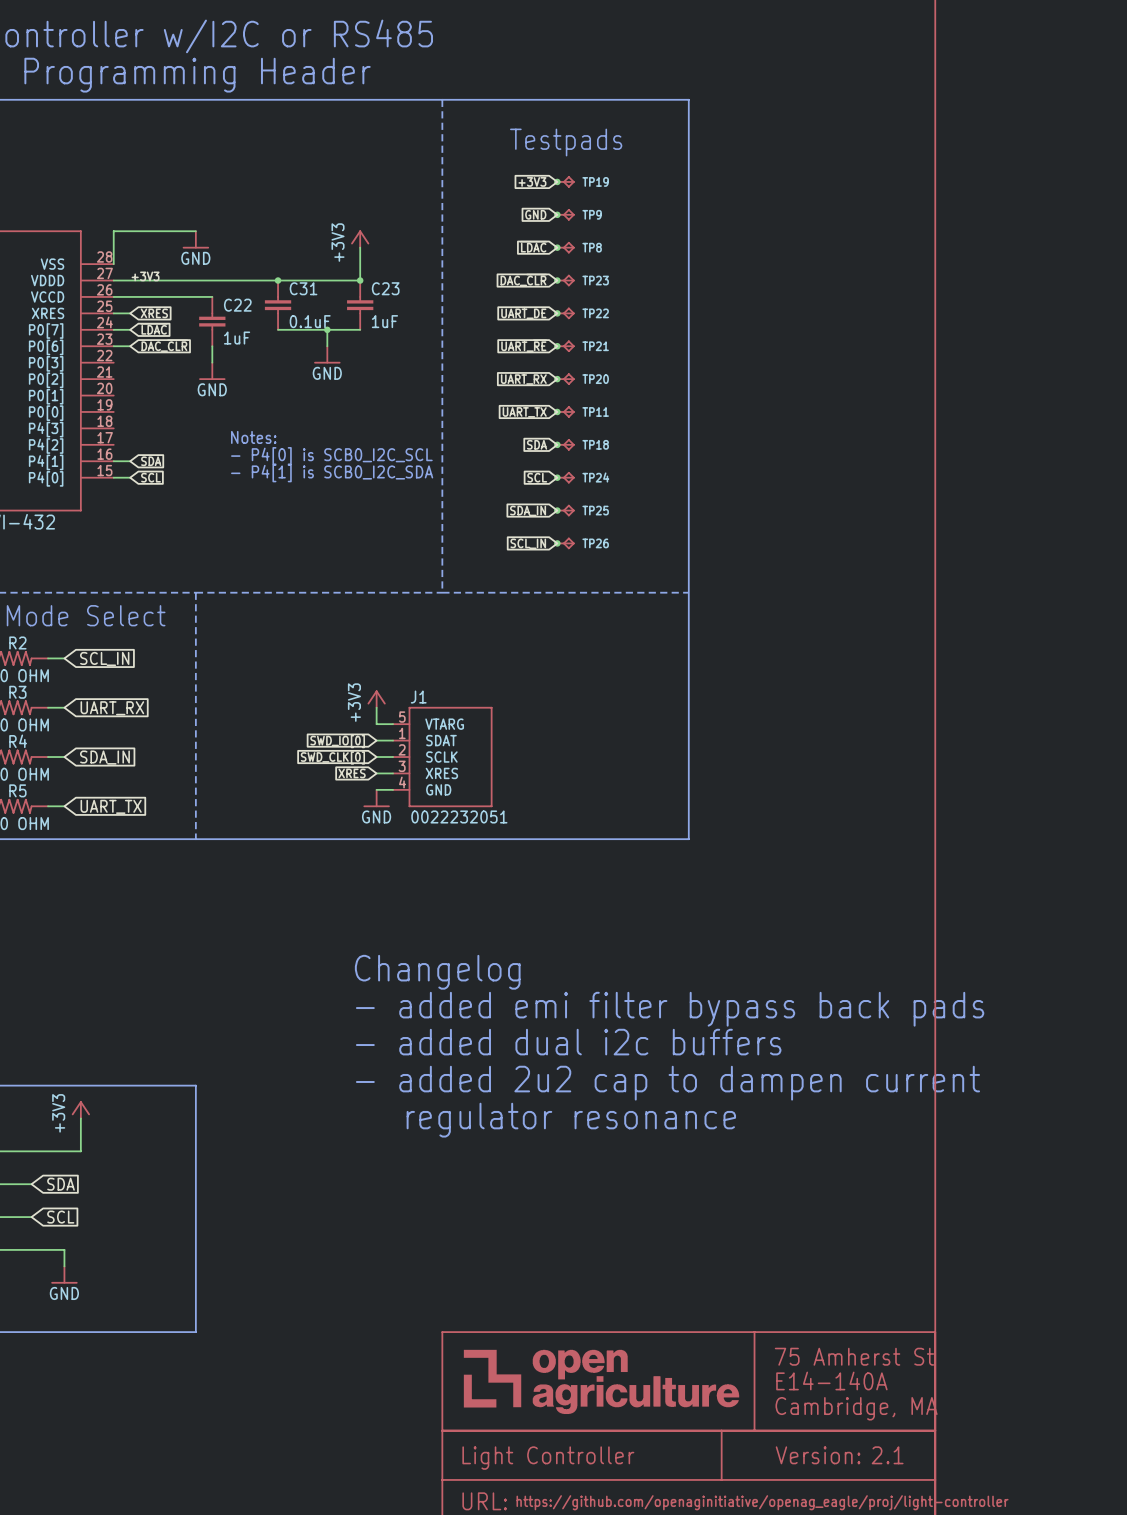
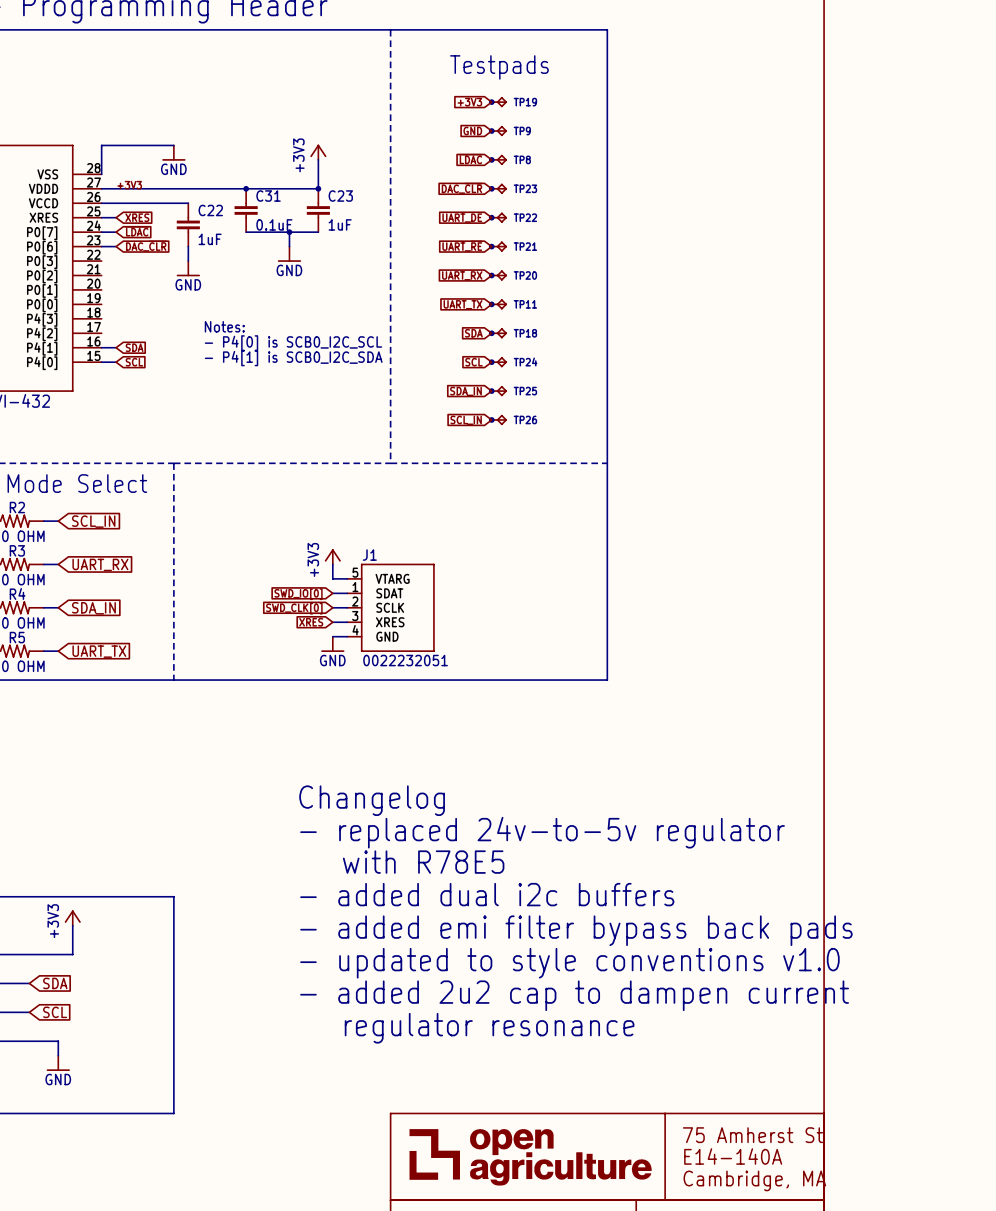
text position: Changelog (437, 972) -> Changelog (372, 800)
text position: - added emi filter bypass back pads (670, 1009) -> - added emi filter bypass back pads (576, 930)
text: none -> - replaced 24v-to-5v regulator (542, 832)
text position: - added dual i2c buffers (568, 1042) -> - added dual i2c buffers (487, 894)
text: none -> with R78E5 (423, 862)
text position: - added 2u2 cap to dampen current (667, 1083) -> - added 2u2 cap to dampen current (574, 995)
text position: regulator resonance (571, 1120) -> regulator resonance (489, 1028)
text: none -> - updated to style conventions v1.0 (569, 963)

